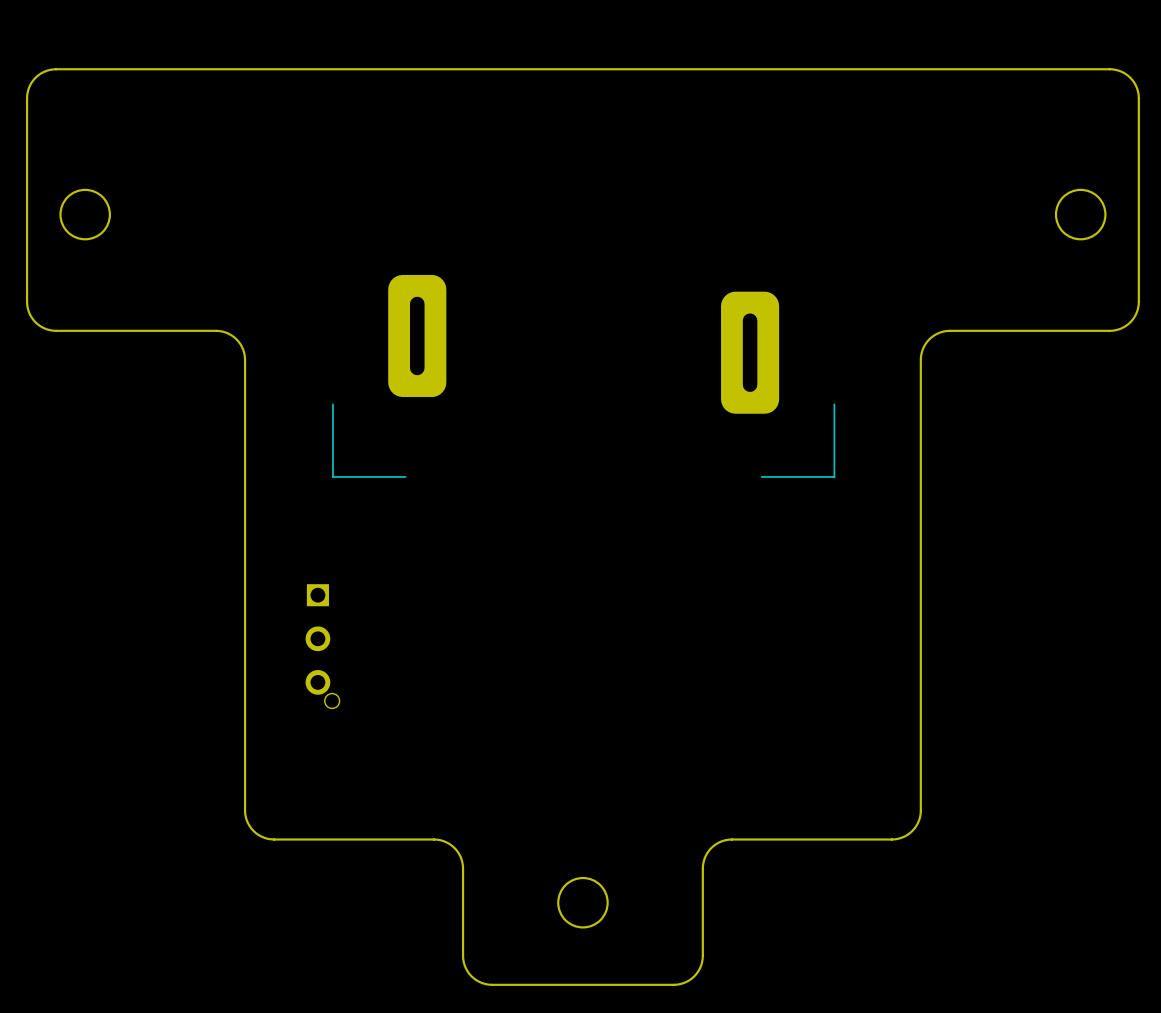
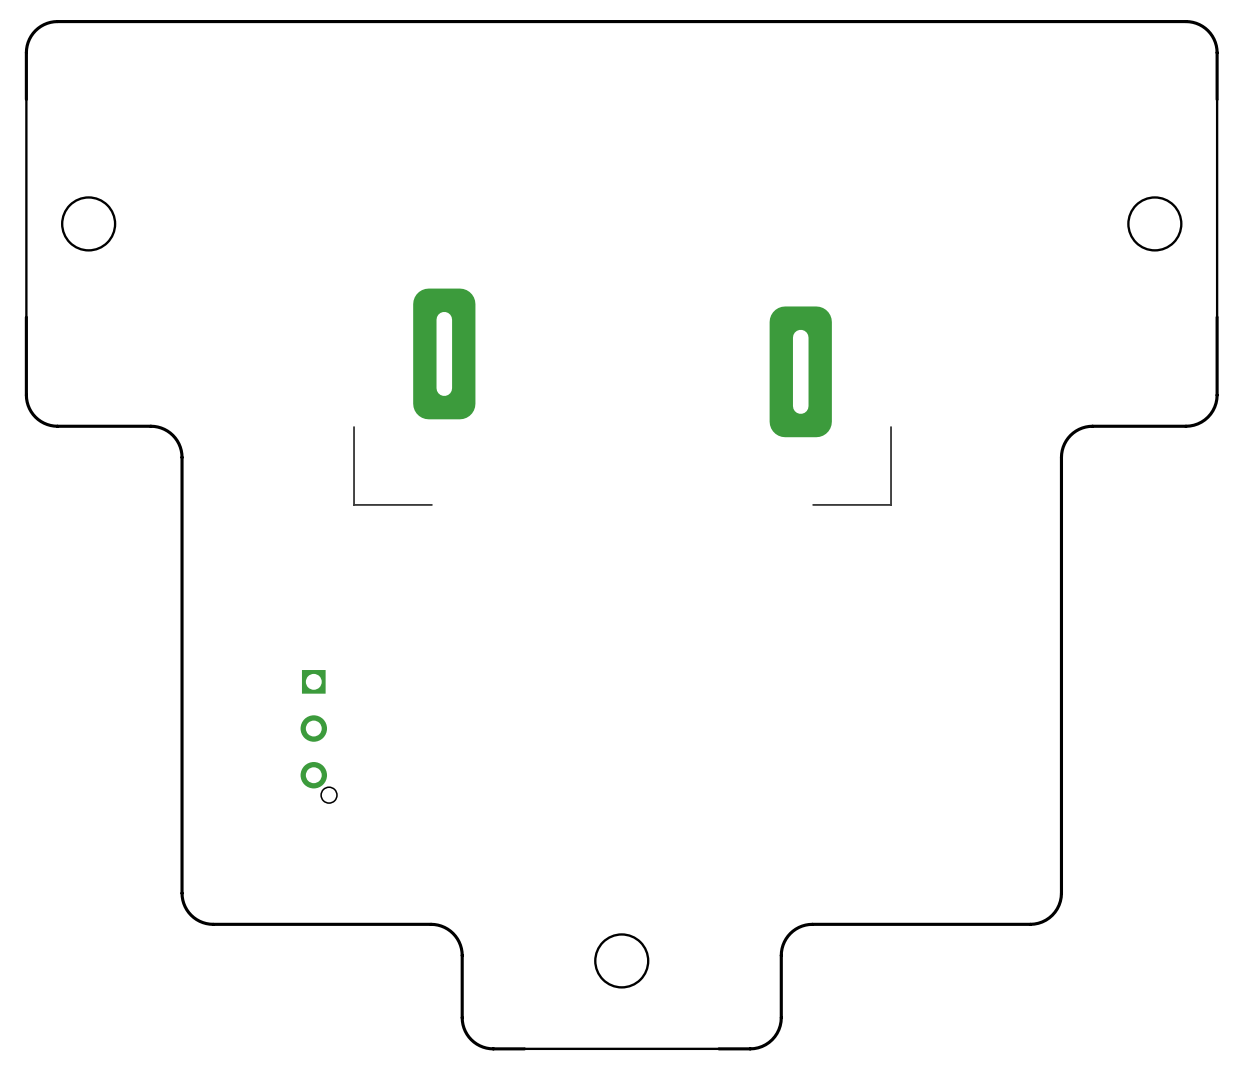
board edge: (1138, 98) (1135, 85) (1130, 77) (1122, 72) (1109, 69) (56, 69) (46, 70) (35, 77) (28, 88) (27, 98) -> (1217, 99) (1215, 42) (1210, 33) (1202, 26) (1185, 21) (54, 21) (38, 28) (28, 42) (26, 99)
board edge: (27, 301) (28, 311) (33, 319) (40, 326) (49, 330) (219, 331) (231, 335) (240, 344) (245, 359) (245, 810) (246, 820) (256, 833) (270, 839) (433, 839) (449, 843) (458, 853) (462, 865) (464, 965) (469, 973) (476, 980) (492, 984) -> (26, 317) (26, 398) (29, 408) (38, 419) (54, 426) (157, 427) (172, 435) (181, 450) (182, 893) (186, 909) (196, 919) (209, 924) (431, 924) (441, 926) (455, 936) (461, 948) (462, 1021) (466, 1034) (473, 1042) (486, 1048) (524, 1048)
board edge: (1138, 301) (1137, 311) (1132, 319) (1125, 326) (1116, 330) (946, 331) (934, 335) (925, 344) (920, 359) (920, 810) (919, 820) (909, 833) (895, 839) (731, 839) (716, 843) (707, 853) (703, 865) (701, 965) (696, 973) (689, 980) (673, 984) -> (1217, 317) (1216, 399) (1212, 410) (1204, 419) (1197, 423) (1185, 426) (1085, 427) (1070, 435) (1062, 450) (1061, 893) (1059, 905) (1055, 912) (1045, 920) (1030, 924) (812, 924) (802, 926) (790, 933) (782, 948) (781, 1021) (774, 1036) (765, 1044) (758, 1047) (719, 1048)
part position: (322, 646) -> (318, 736)

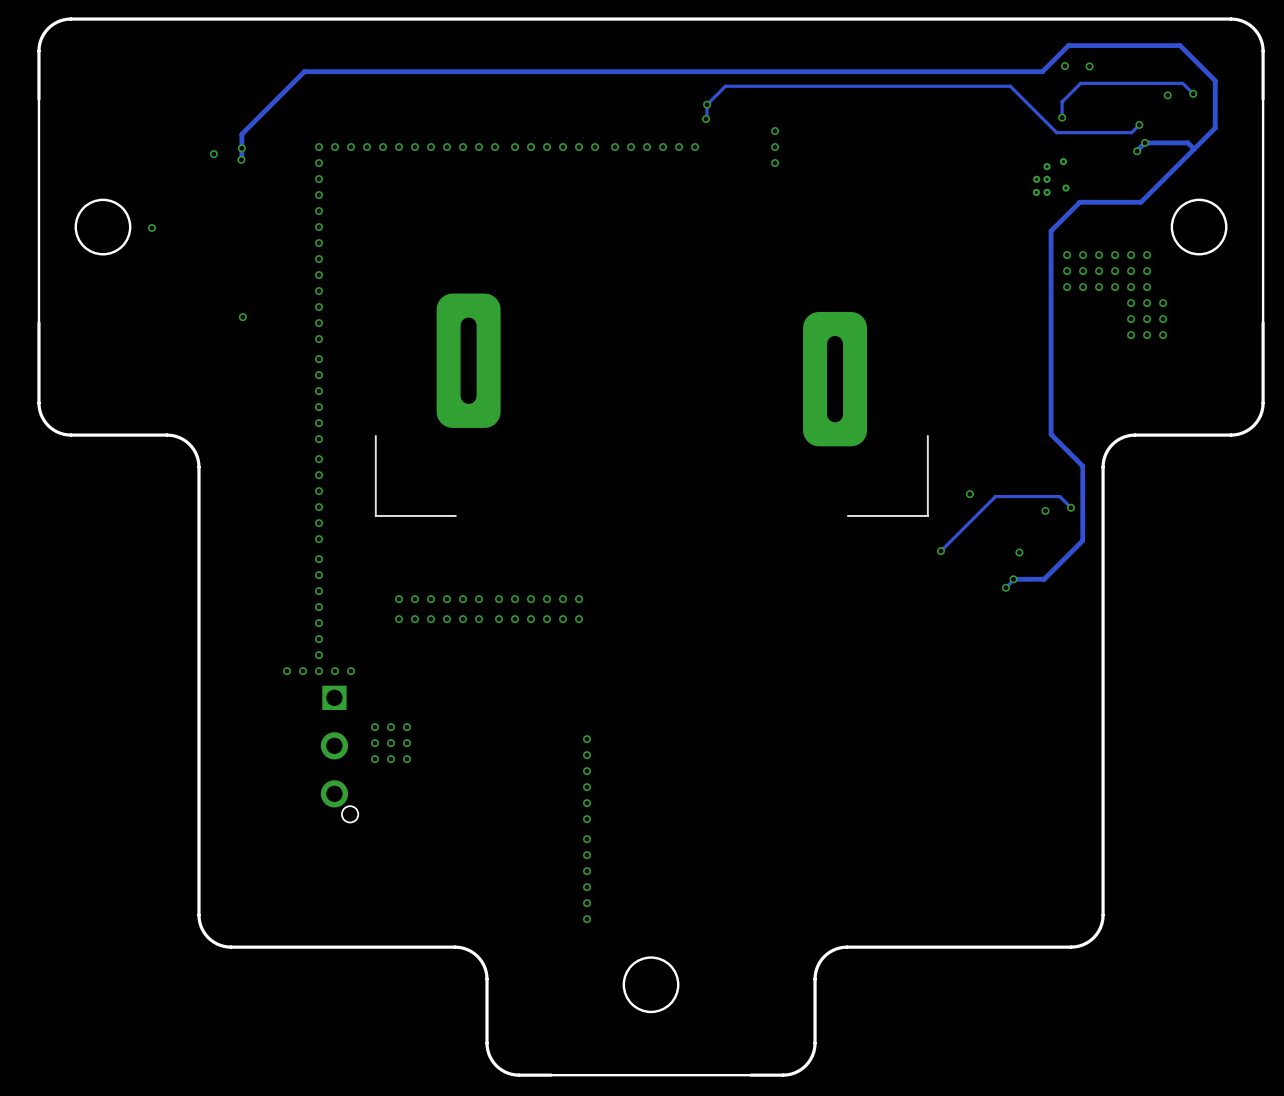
via: none -> (1064, 66)
via: none -> (1089, 66)
track: none -> (1193, 93) (1182, 83) (1080, 83) (1062, 101) (1062, 117)
via: none -> (1193, 93)
via: none -> (1167, 95)
via: none -> (707, 104)
via: none -> (1062, 117)
track: none -> (706, 119) (707, 104) (725, 86) (1010, 86) (1056, 132) (1131, 132) (1139, 124)
via: none -> (706, 119)
via: none -> (1139, 124)
via: none -> (775, 131)
via: none -> (1145, 142)
via: none -> (318, 147)
via: none -> (334, 147)
via: none -> (351, 147)
via: none -> (367, 147)
via: none -> (383, 147)
via: none -> (399, 147)
via: none -> (415, 147)
via: none -> (431, 147)
via: none -> (447, 147)
via: none -> (463, 147)
via: none -> (479, 147)
via: none -> (495, 147)
via: none -> (515, 147)
via: none -> (531, 147)
via: none -> (547, 147)
via: none -> (563, 147)
via: none -> (579, 147)
via: none -> (595, 147)
via: none -> (615, 147)
via: none -> (631, 147)
via: none -> (647, 147)
via: none -> (663, 147)
via: none -> (679, 147)
via: none -> (695, 147)
via: none -> (775, 147)
via: none -> (241, 148)
track: none -> (1194, 149) (1187, 142) (1145, 142) (1137, 151)
via: none -> (1137, 151)
via: none -> (213, 154)
track: none -> (241, 159) (241, 134) (304, 71) (1042, 71) (1068, 45) (1180, 45) (1215, 80) (1215, 128) (1141, 202) (1079, 202) (1051, 231) (1051, 434) (1082, 466) (1082, 540) (1044, 579) (1013, 579) (1005, 587)
via: none -> (241, 159)
via: none -> (1063, 161)
via: none -> (318, 163)
via: none -> (775, 163)
via: none -> (1047, 166)
via: none -> (318, 179)
via: none -> (1036, 179)
via: none -> (1047, 179)
via: none -> (1065, 188)
via: none -> (1036, 192)
via: none -> (1047, 192)
via: none -> (318, 195)
via: none -> (318, 211)
via: none -> (318, 227)
via: none -> (151, 228)
via: none -> (318, 243)
via: none -> (1067, 255)
via: none -> (1083, 255)
via: none -> (1099, 255)
via: none -> (1115, 255)
via: none -> (1131, 255)
via: none -> (1147, 255)
via: none -> (318, 259)
via: none -> (1067, 271)
via: none -> (1083, 271)
via: none -> (1099, 271)
via: none -> (1115, 271)
via: none -> (1131, 271)
via: none -> (1147, 271)
via: none -> (318, 275)
via: none -> (1067, 287)
via: none -> (1083, 287)
via: none -> (1099, 287)
via: none -> (1115, 287)
via: none -> (1131, 287)
via: none -> (1147, 287)
via: none -> (318, 291)
via: none -> (1131, 303)
via: none -> (1147, 303)
via: none -> (1163, 303)
via: none -> (318, 307)
via: none -> (242, 317)
via: none -> (1131, 319)
via: none -> (1147, 319)
via: none -> (1163, 319)
via: none -> (318, 323)
via: none -> (1131, 335)
via: none -> (1147, 335)
via: none -> (1163, 335)
via: none -> (318, 339)
via: none -> (318, 359)
via: none -> (318, 375)
via: none -> (318, 391)
via: none -> (318, 407)
via: none -> (318, 423)
via: none -> (318, 439)
via: none -> (318, 459)
via: none -> (318, 475)
via: none -> (318, 491)
via: none -> (969, 494)
via: none -> (318, 507)
track: none -> (1070, 507) (1059, 496) (995, 496) (940, 551)
via: none -> (1070, 507)
via: none -> (1045, 510)
via: none -> (318, 523)
via: none -> (318, 539)
via: none -> (940, 551)
via: none -> (1019, 552)
via: none -> (318, 559)
via: none -> (318, 575)
via: none -> (1013, 579)
via: none -> (1005, 587)
via: none -> (318, 591)
via: none -> (399, 599)
via: none -> (415, 599)
via: none -> (431, 599)
via: none -> (447, 599)
via: none -> (463, 599)
via: none -> (479, 599)
via: none -> (499, 599)
via: none -> (515, 599)
via: none -> (531, 599)
via: none -> (547, 599)
via: none -> (563, 599)
via: none -> (579, 599)
via: none -> (318, 607)
via: none -> (399, 619)
via: none -> (415, 619)
via: none -> (431, 619)
via: none -> (447, 619)
via: none -> (463, 619)
via: none -> (479, 619)
via: none -> (499, 619)
via: none -> (515, 619)
via: none -> (531, 619)
via: none -> (547, 619)
via: none -> (563, 619)
via: none -> (579, 619)
via: none -> (318, 623)
via: none -> (318, 639)
via: none -> (318, 655)
via: none -> (286, 671)
via: none -> (302, 671)
via: none -> (318, 671)
via: none -> (334, 671)
via: none -> (351, 671)
via: none -> (375, 727)
via: none -> (391, 727)
via: none -> (407, 727)
via: none -> (587, 739)
via: none -> (375, 743)
via: none -> (391, 743)
via: none -> (407, 743)
via: none -> (587, 755)
via: none -> (375, 759)
via: none -> (391, 759)
via: none -> (407, 759)
via: none -> (587, 771)
via: none -> (587, 787)
via: none -> (587, 803)
via: none -> (587, 819)
via: none -> (587, 839)
via: none -> (587, 855)
via: none -> (587, 871)
via: none -> (587, 887)
via: none -> (587, 903)
via: none -> (587, 919)

